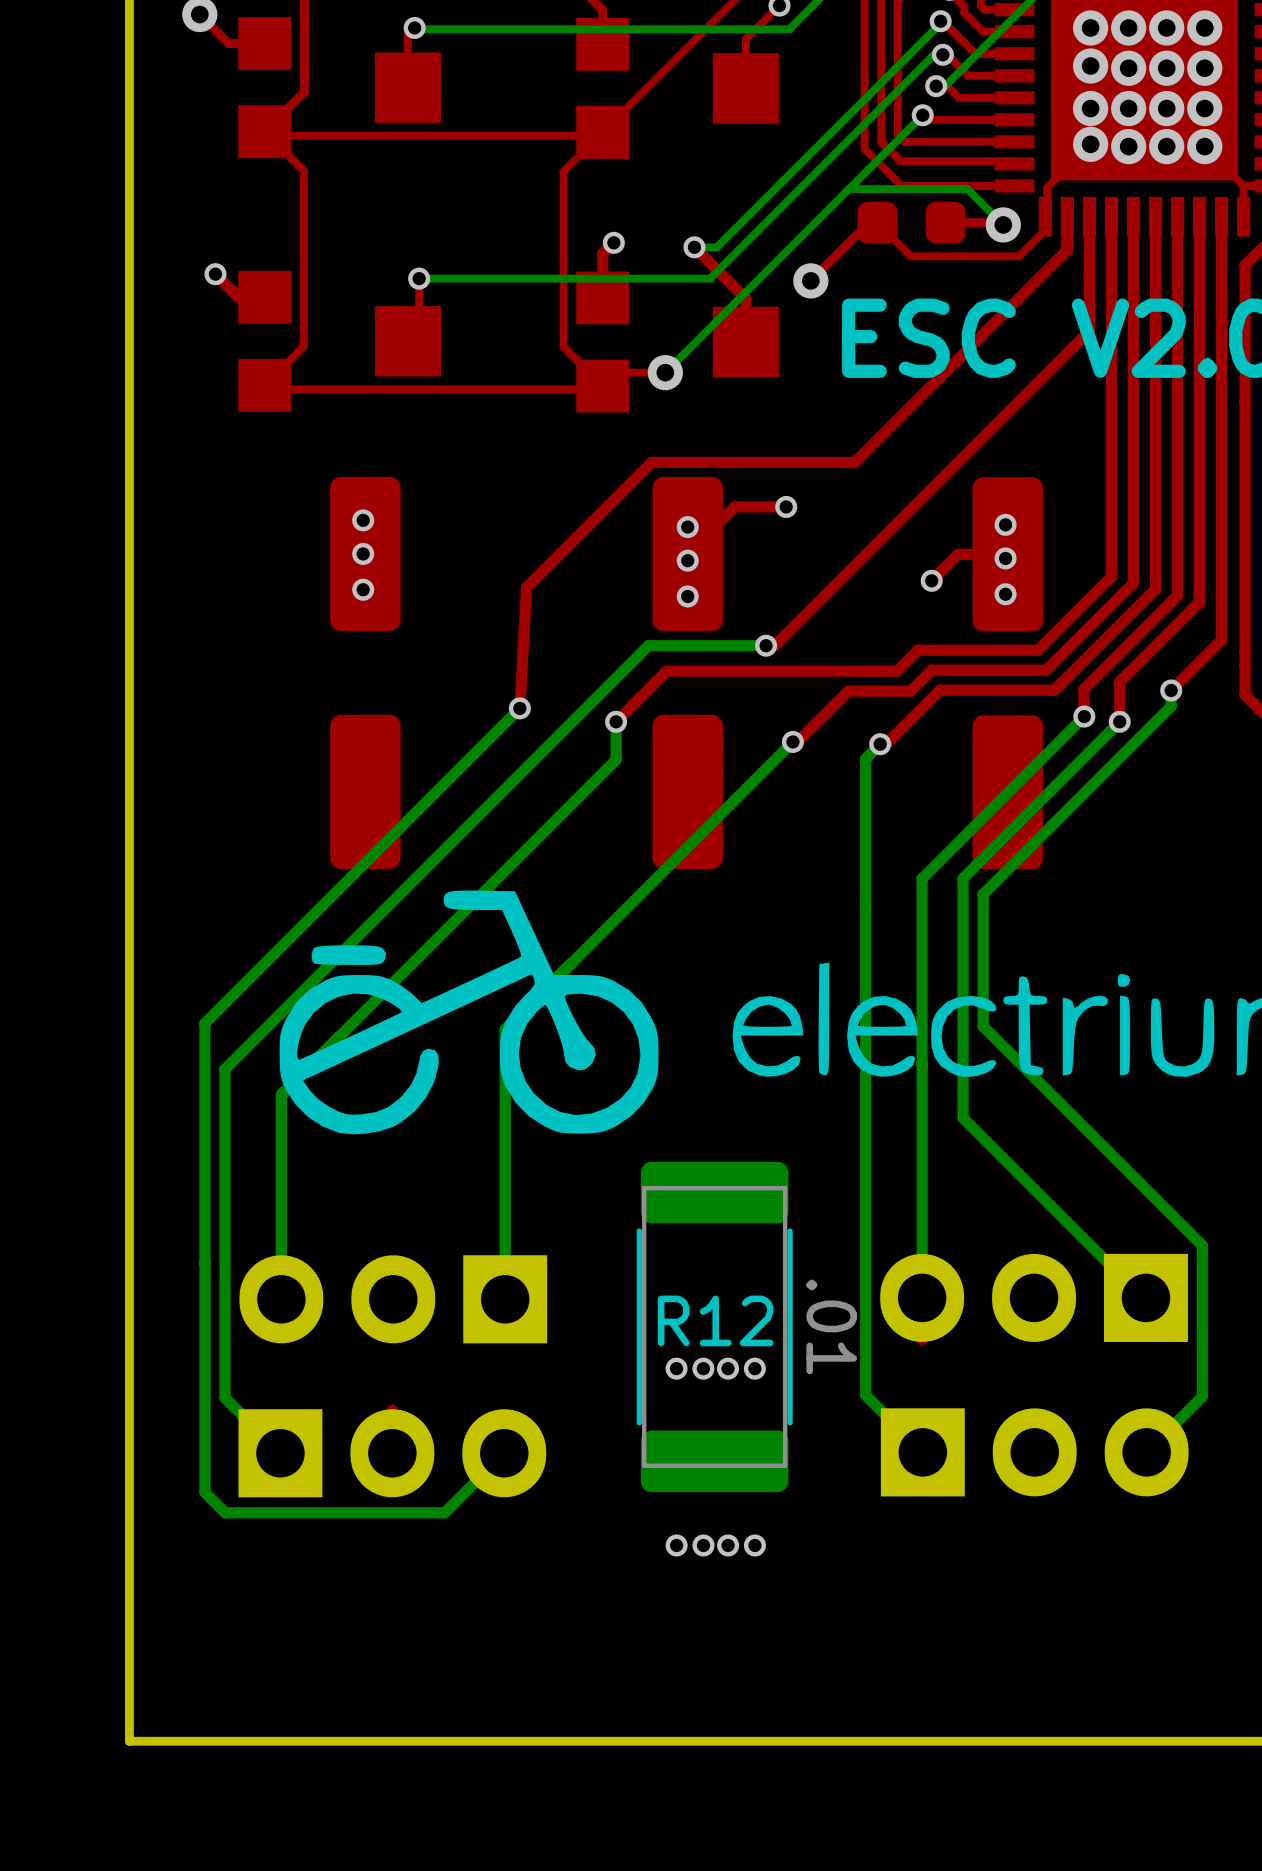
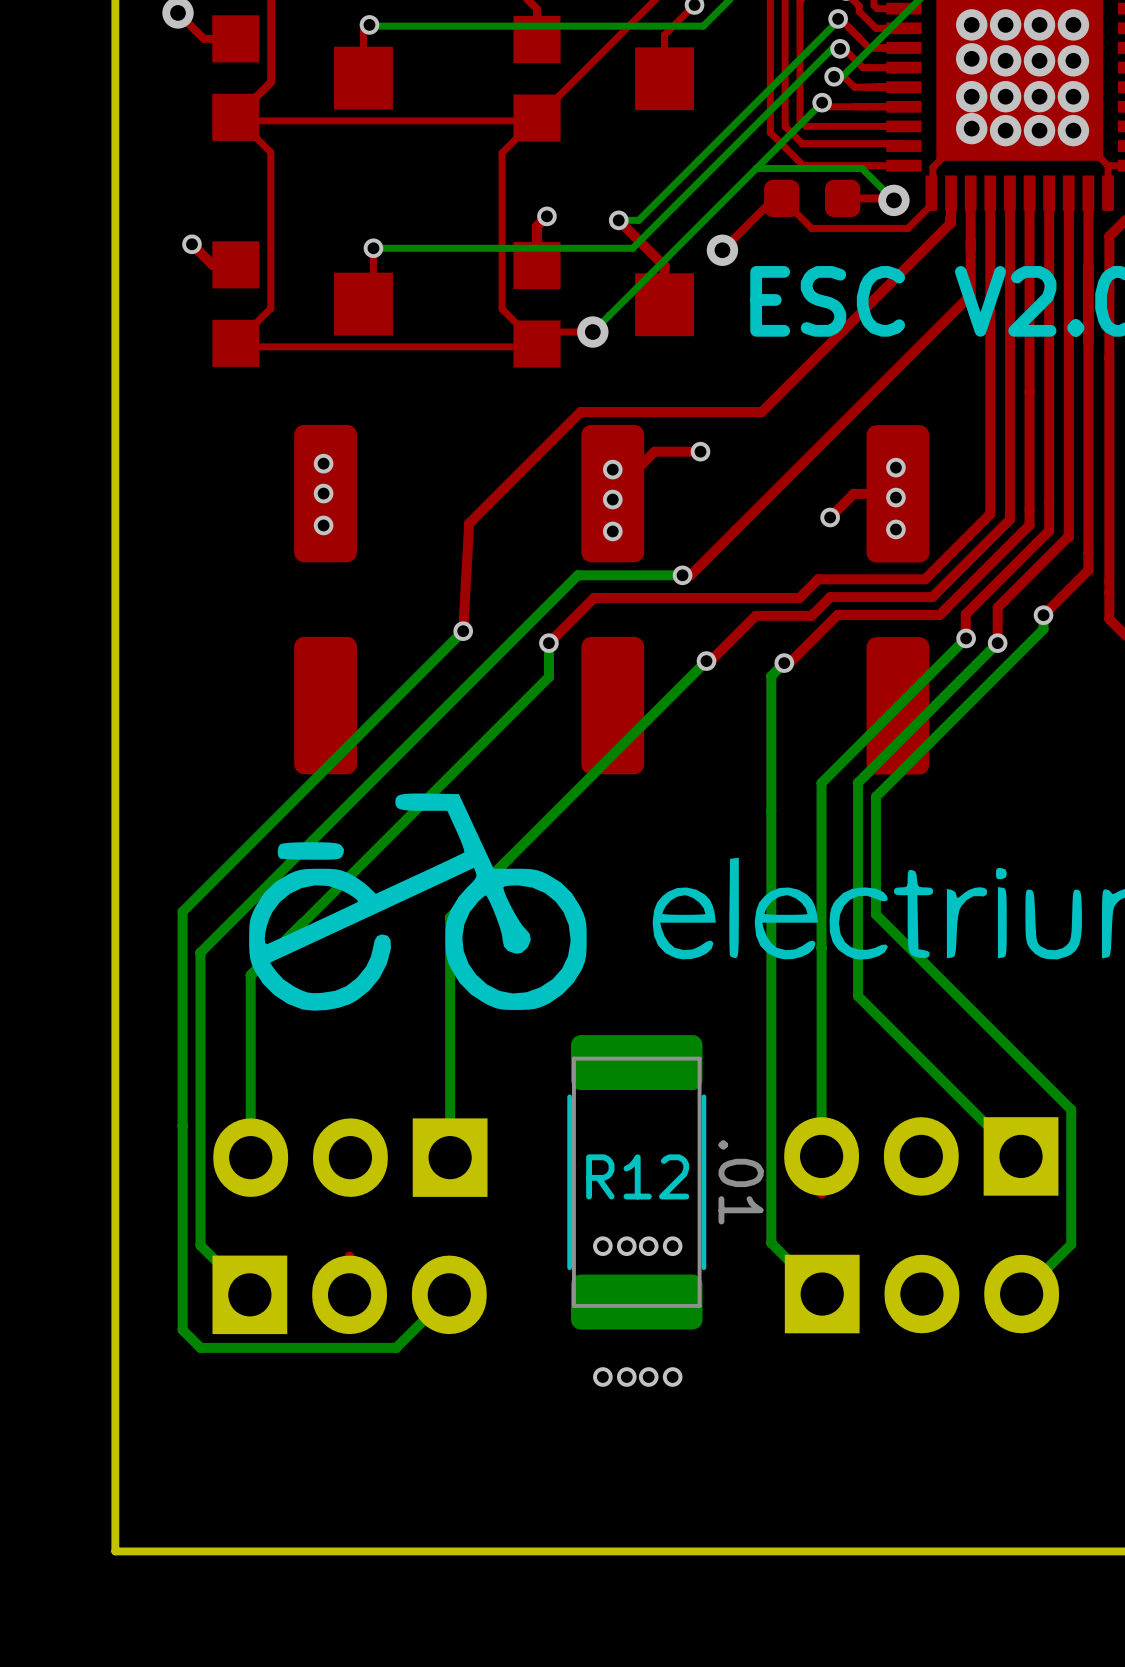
via: (676, 1368) -> none
via: (703, 1368) -> none
via: (728, 1368) -> none
via: (754, 1368) -> none
via: none -> (602, 1246)
via: none -> (626, 1246)
via: none -> (648, 1246)
via: none -> (672, 1246)

